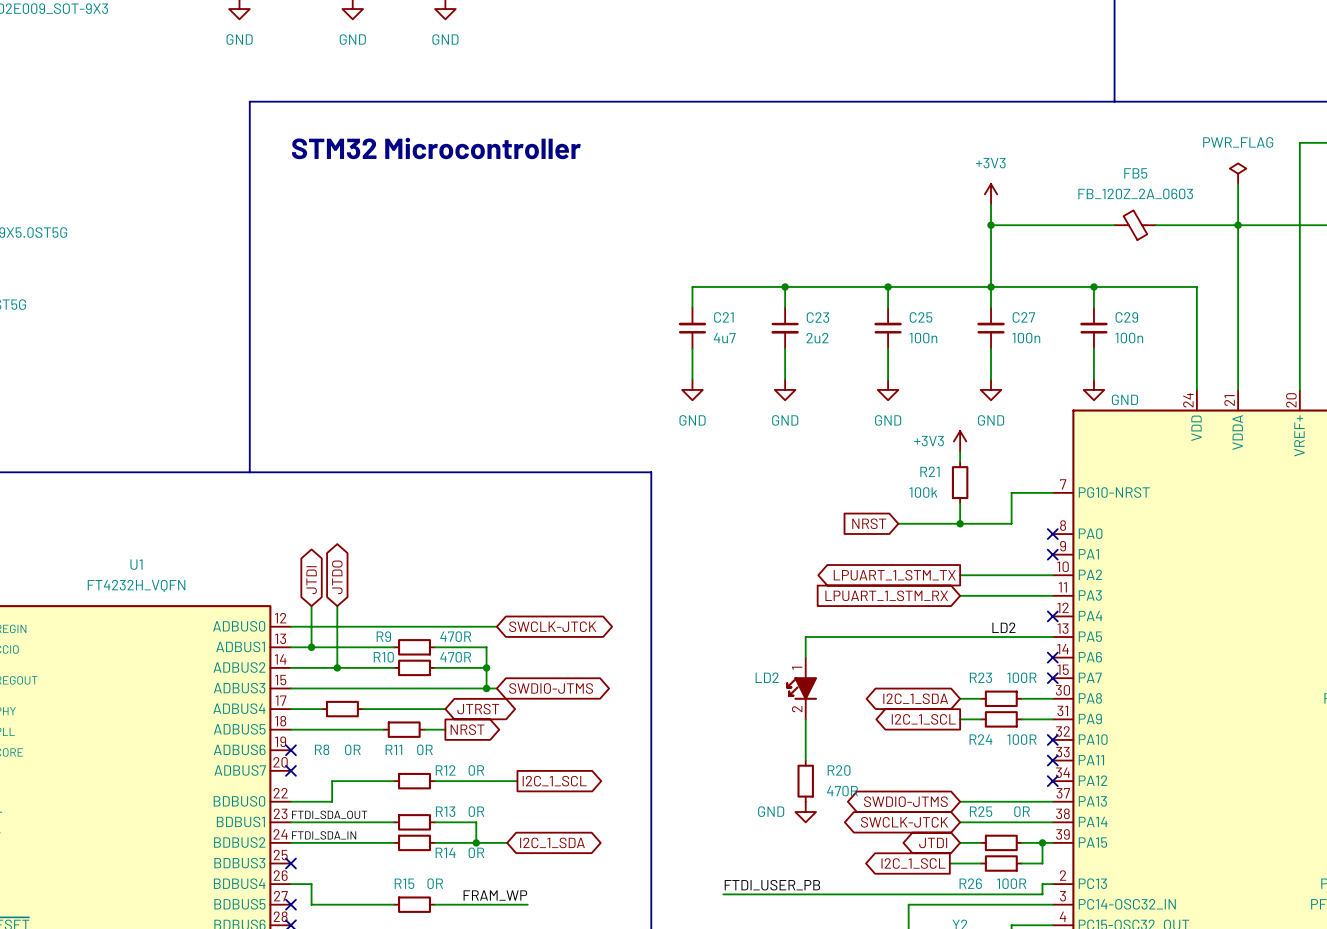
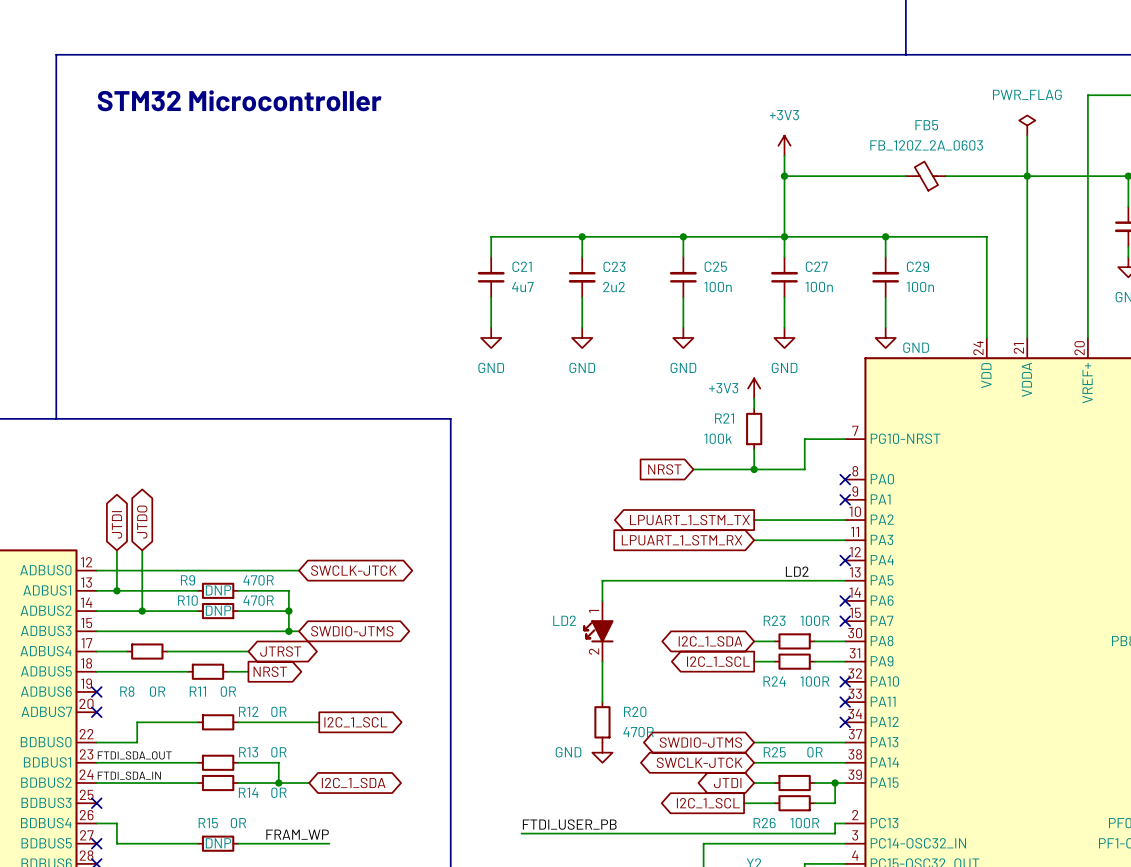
R9 text: none -> DNP (218, 590)
R10 text: none -> DNP (218, 610)
R15 text: none -> DNP (218, 843)

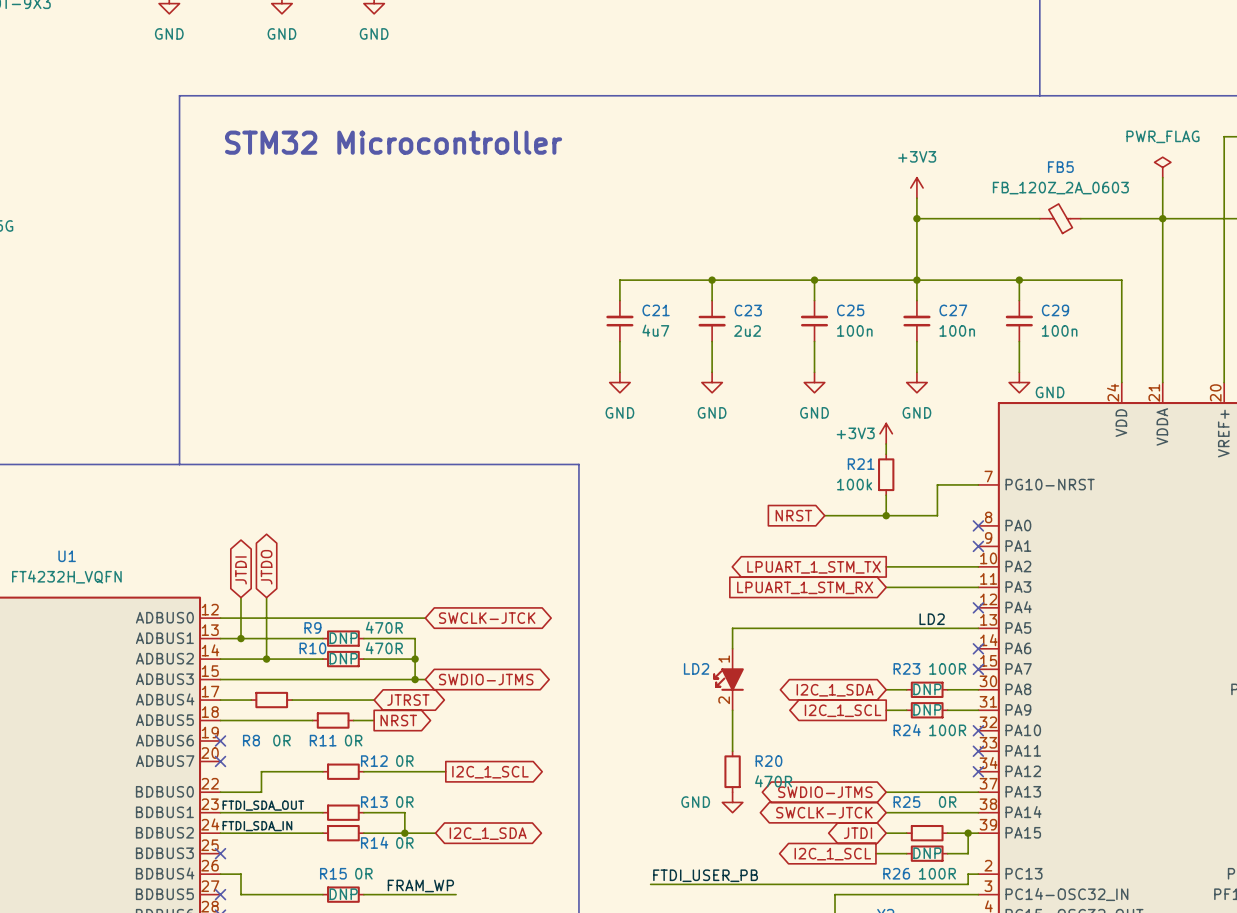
R23 text: none -> DNP (927, 689)
R24 text: none -> DNP (927, 709)
R26 text: none -> DNP (927, 853)

